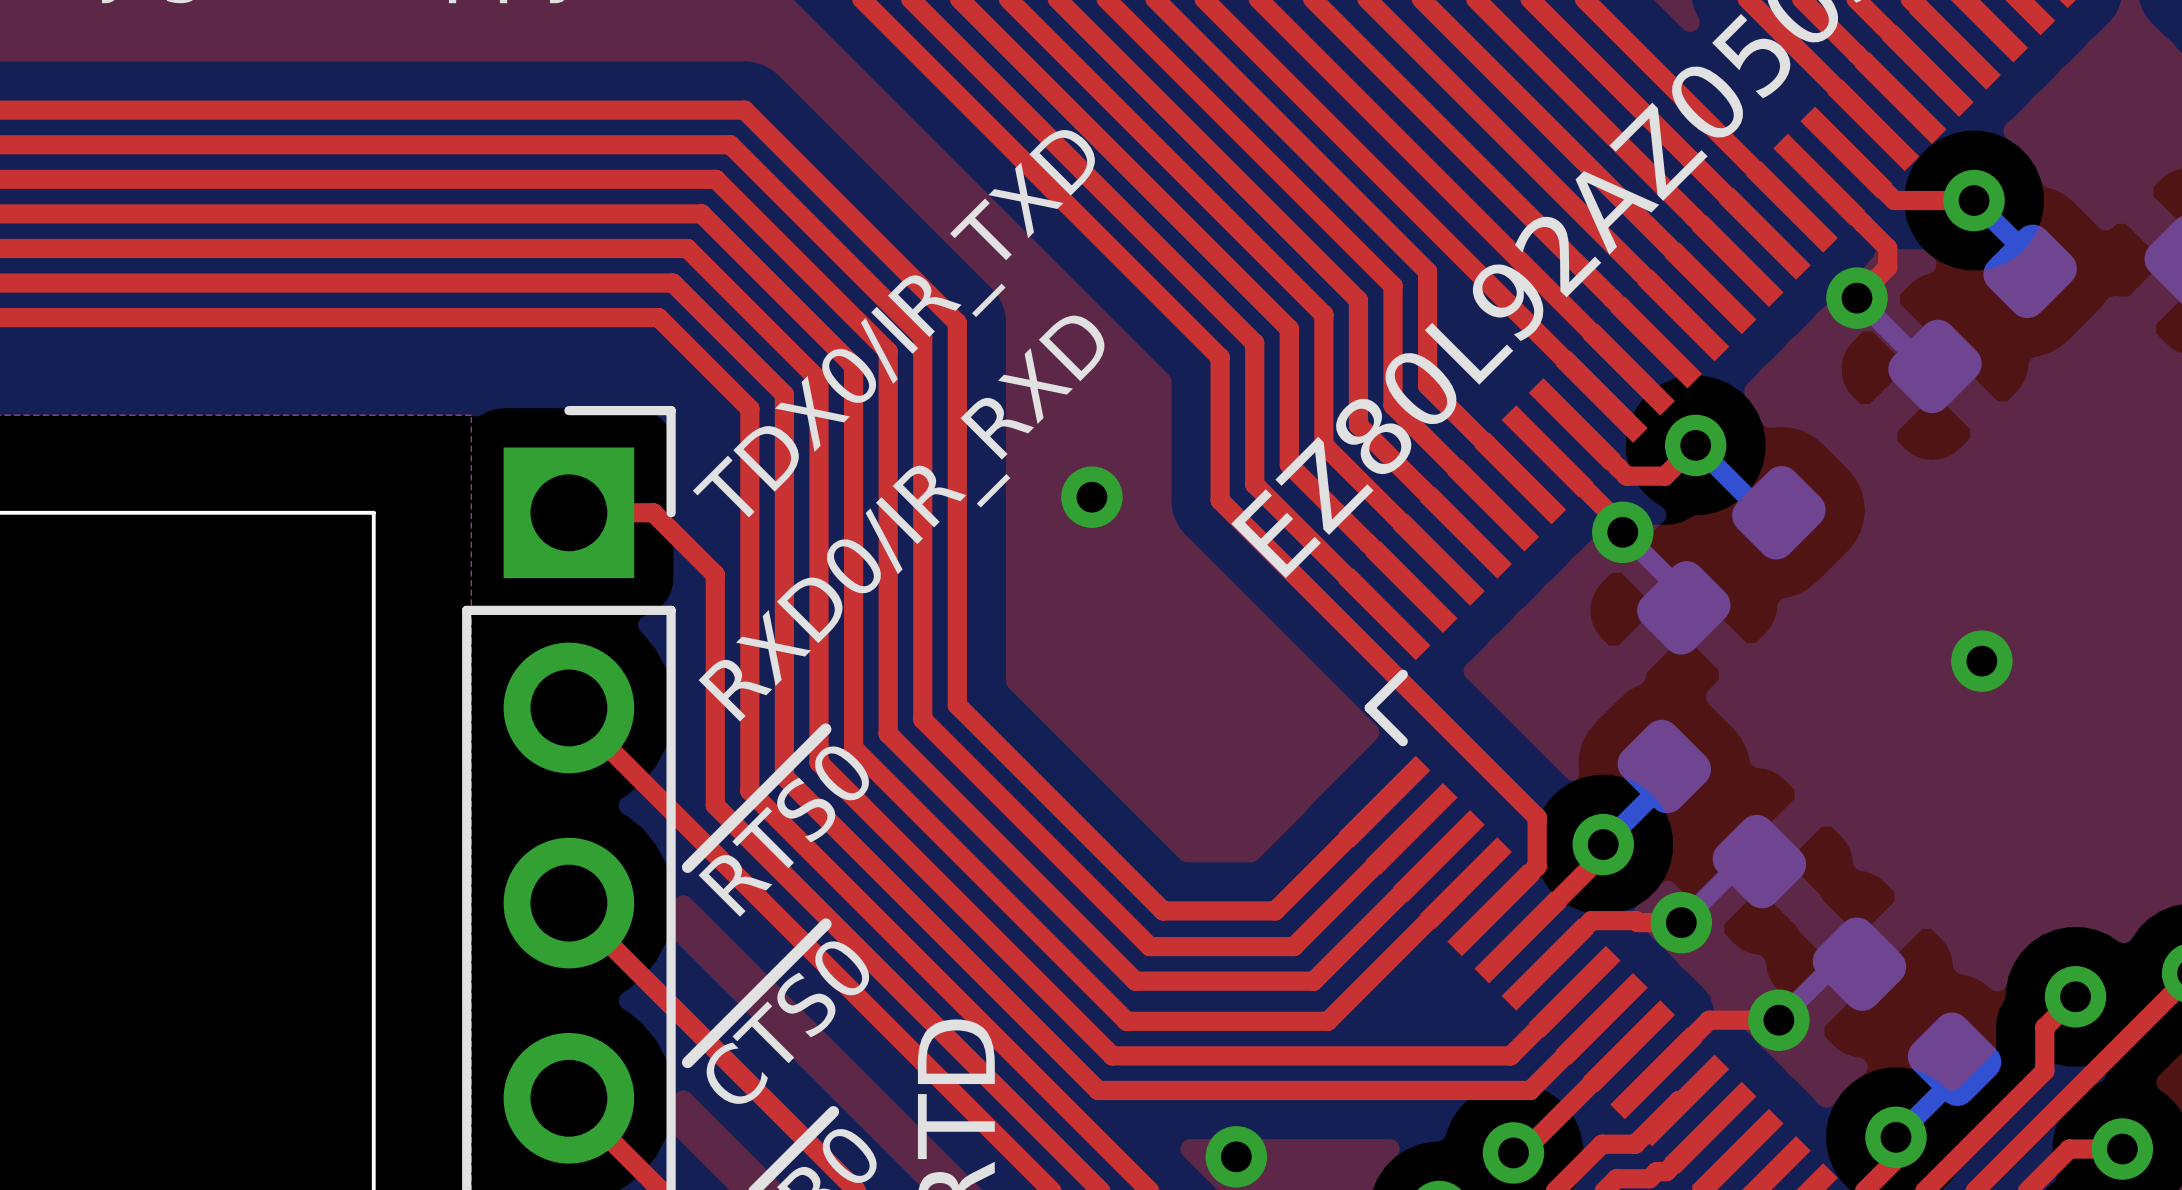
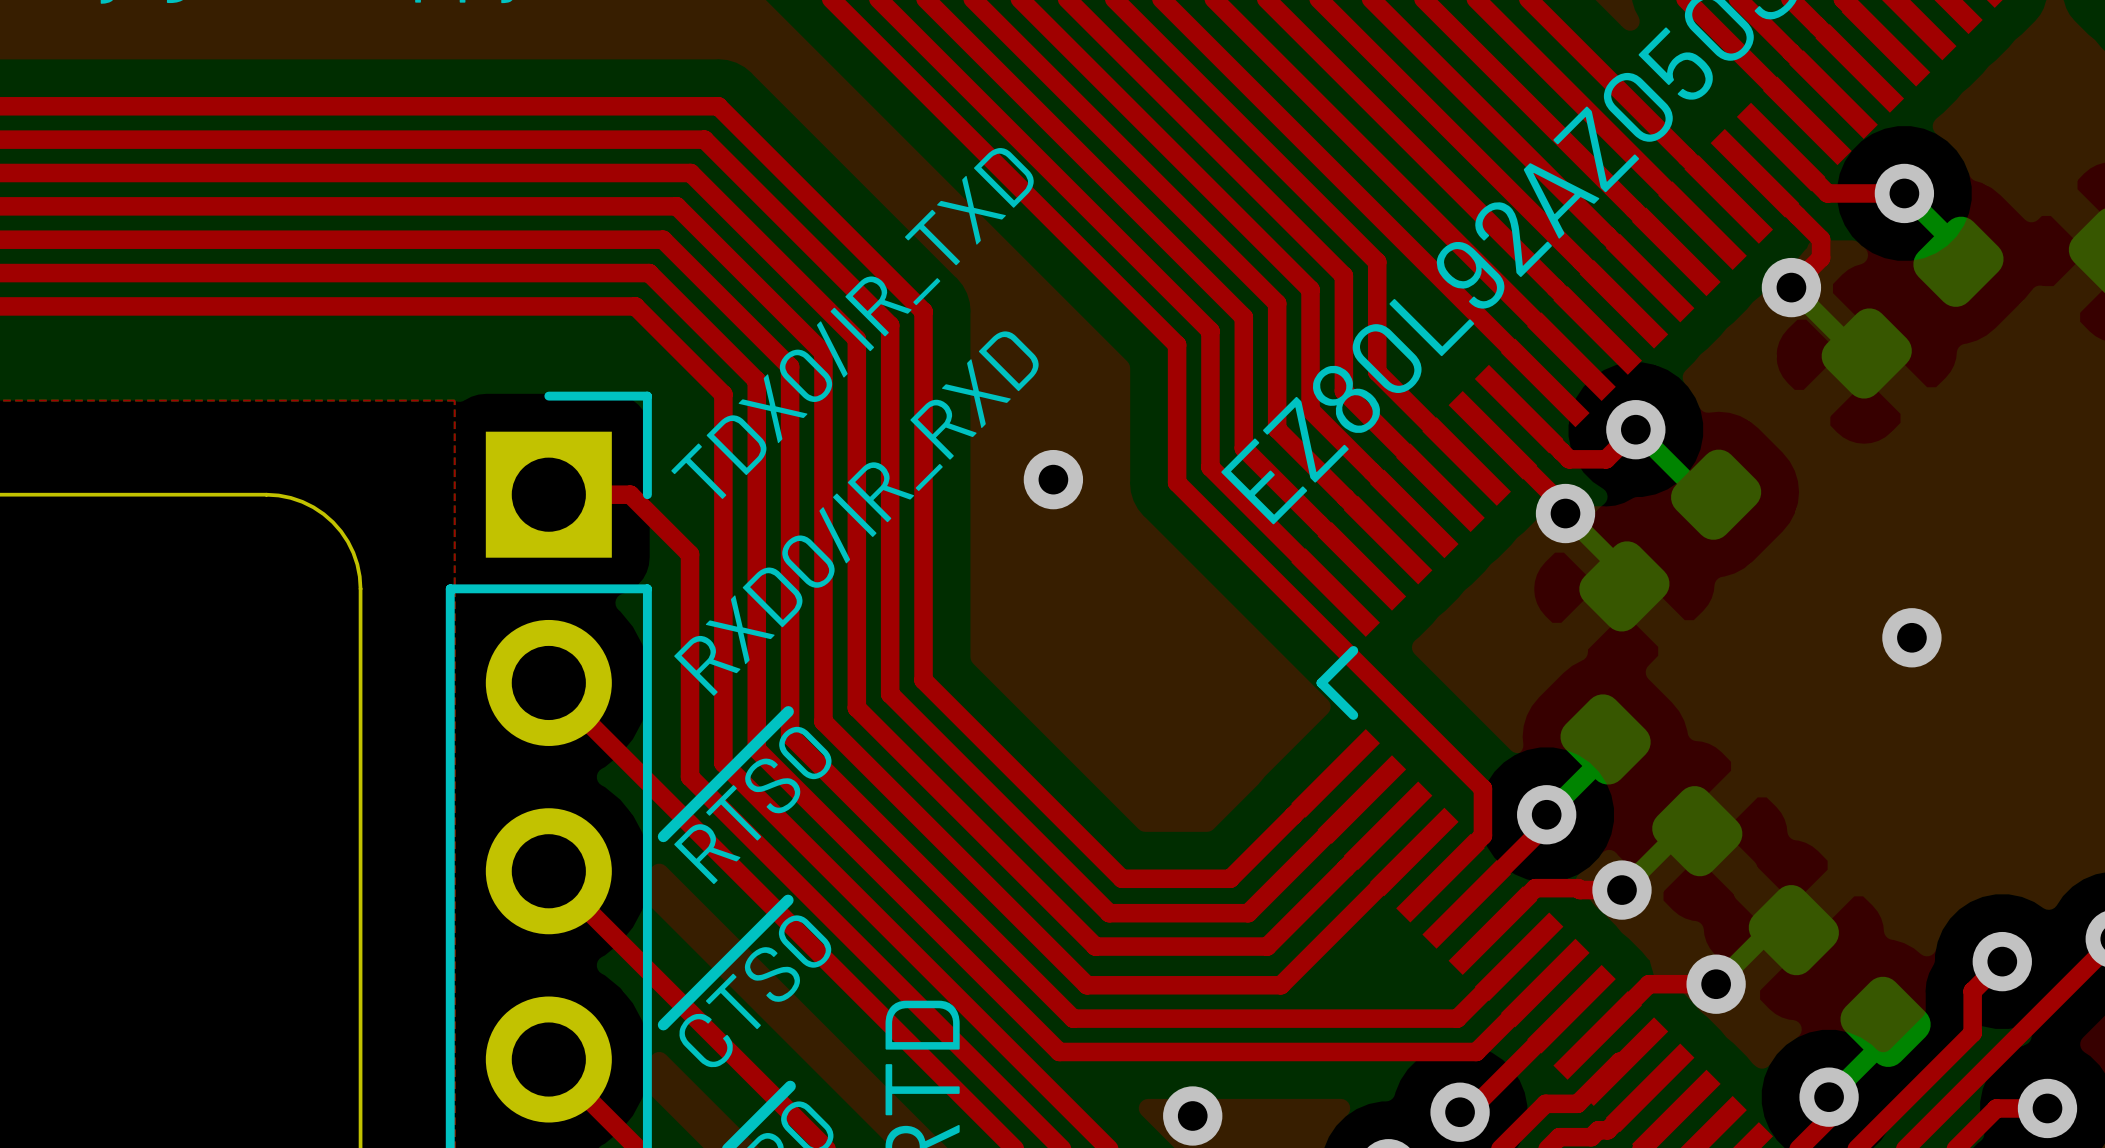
board edge: (276, 512) (373, 512) (373, 610) -> (266, 494) (278, 495) (302, 501) (313, 507) (332, 522) (347, 541) (353, 552) (359, 576) (360, 588)

